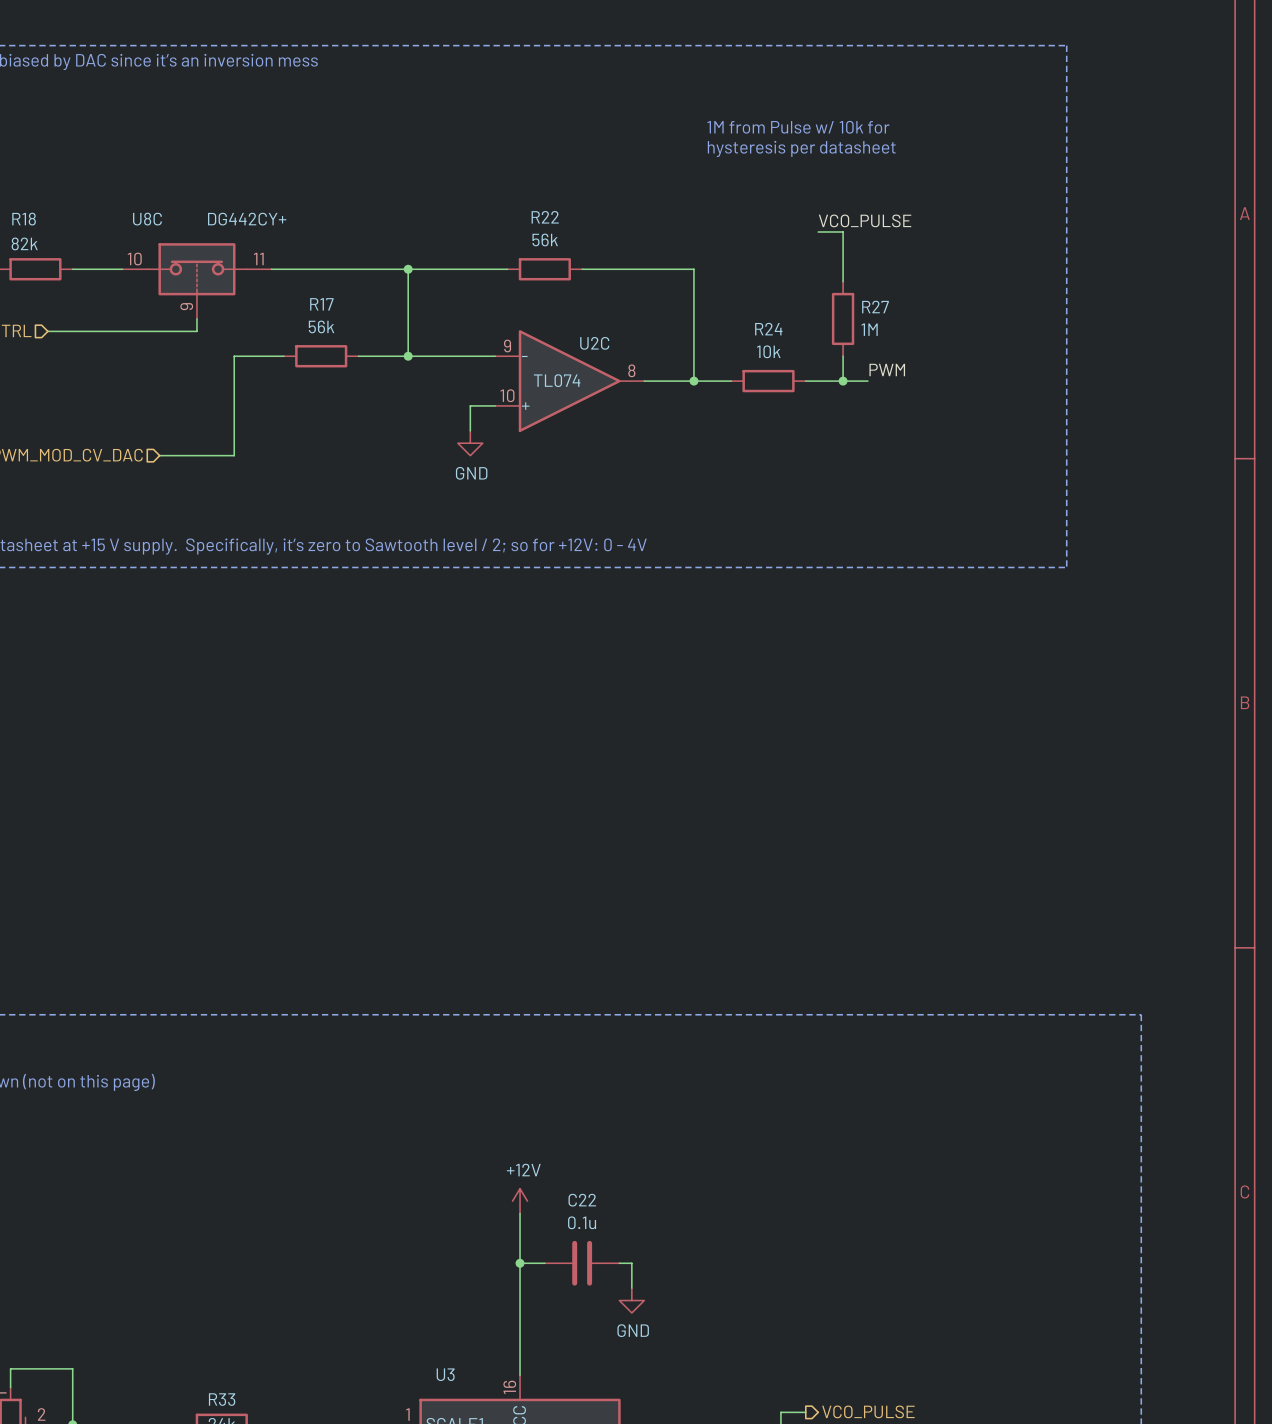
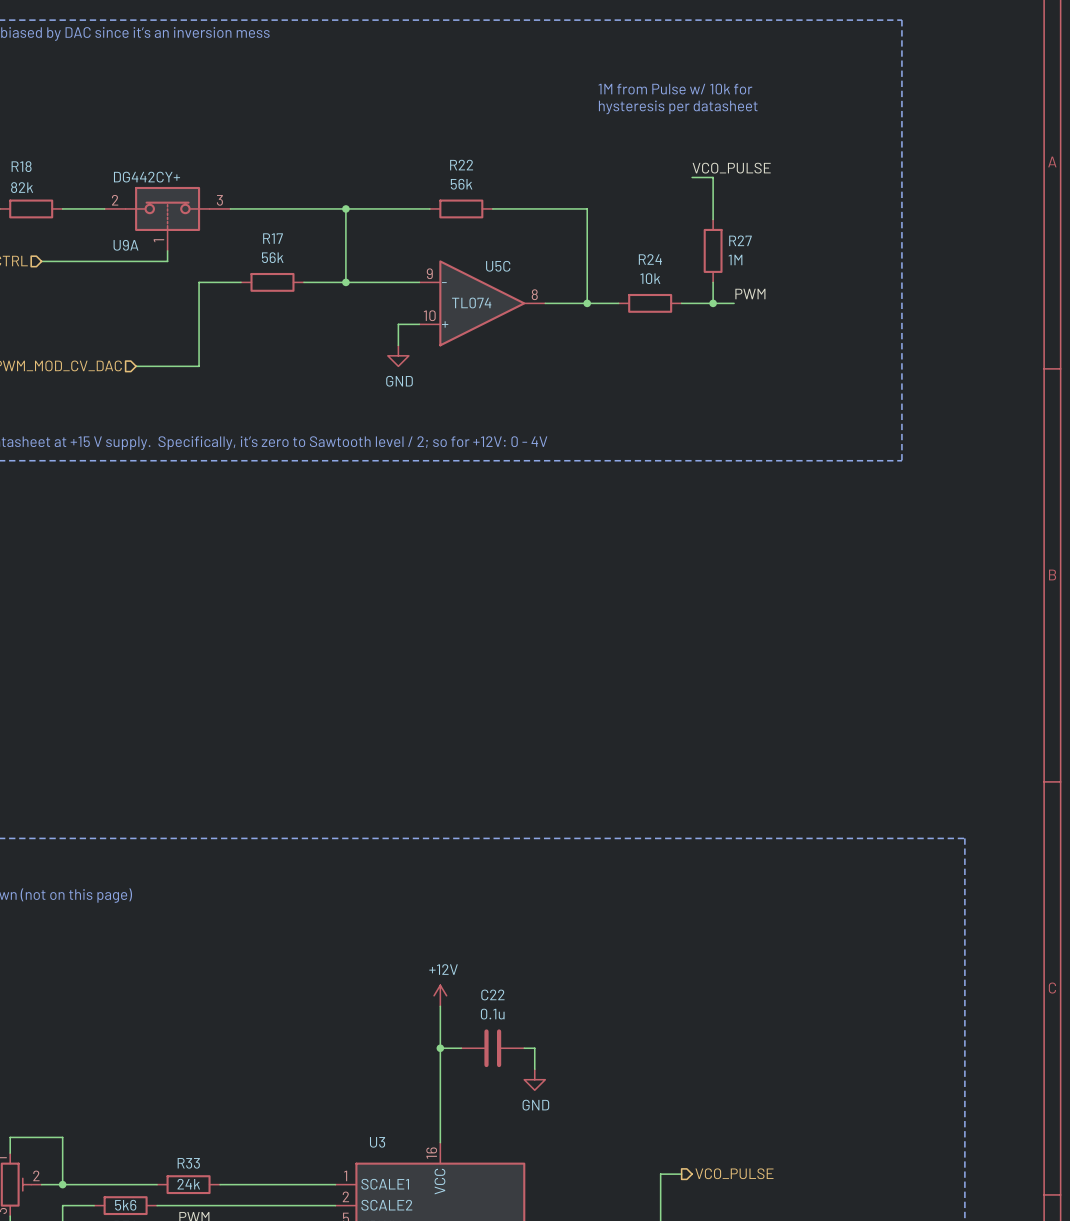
U8C name: U8C (147, 219) -> U9A (125, 245)
U8C value position: DG442CY+ (247, 219) -> DG442CY+ (147, 177)
U8C pin number: 10 (134, 259) -> 2 (115, 200)
U8C pin number: 11 (258, 259) -> 3 (219, 200)
U8C pin number: 9 (186, 306) -> 1 (158, 240)
U2C name: U2C (594, 343) -> U5C (498, 266)

